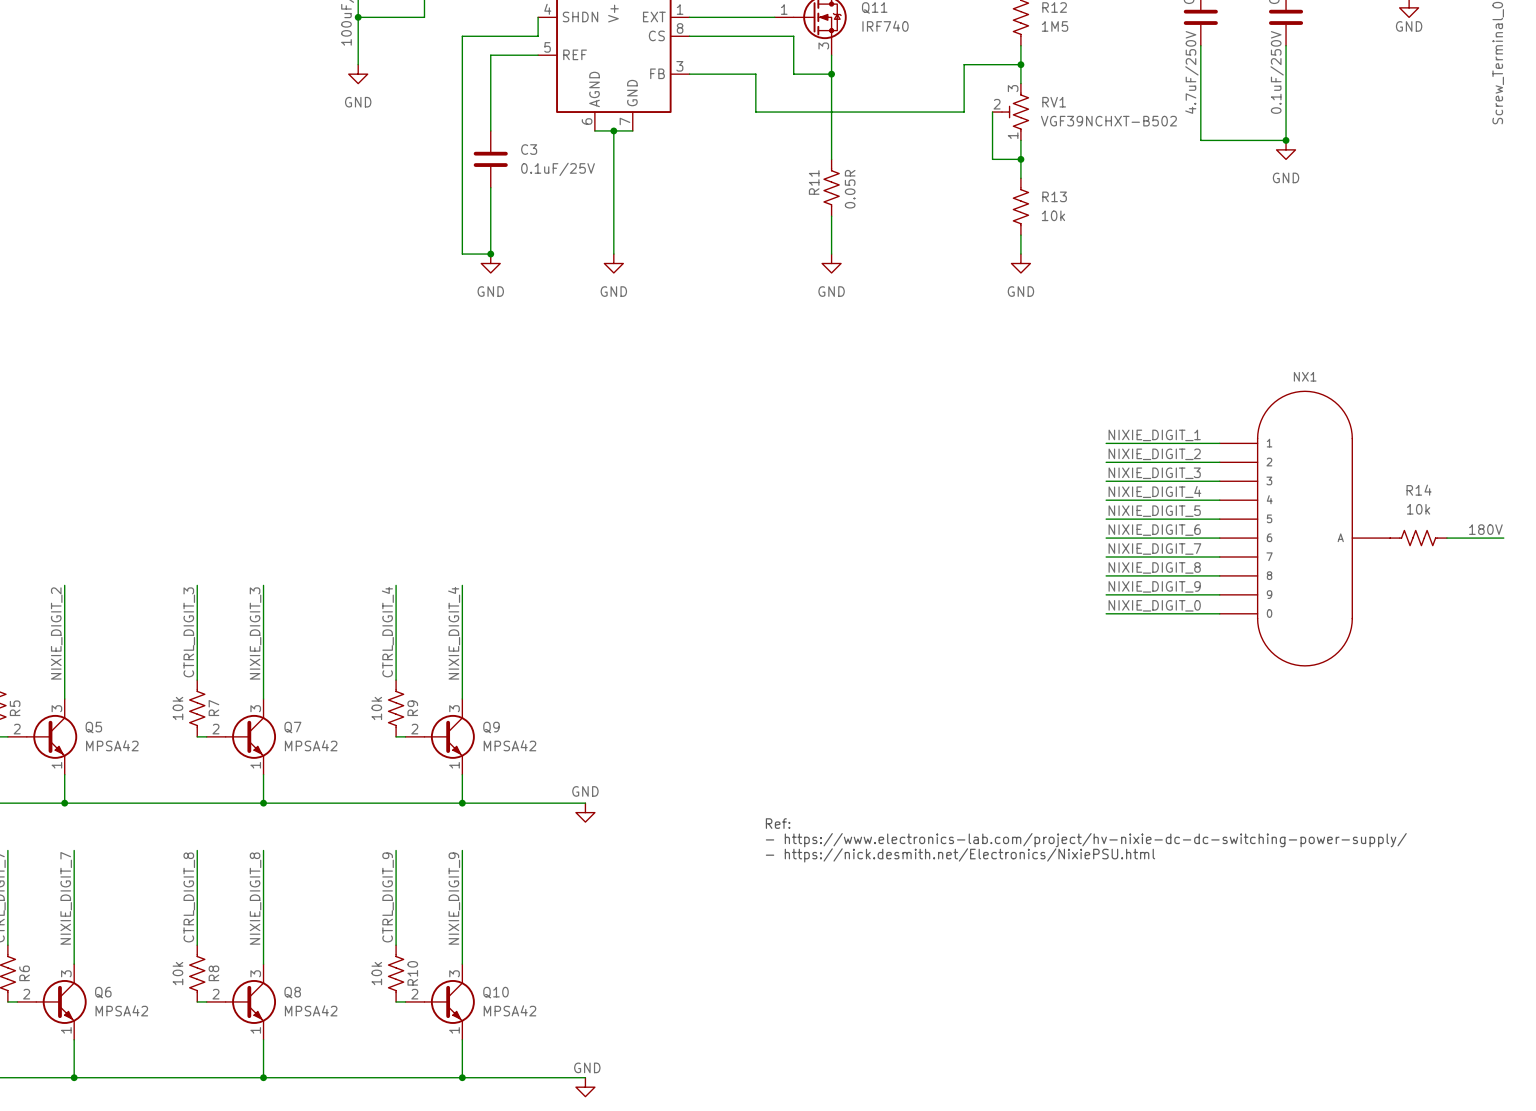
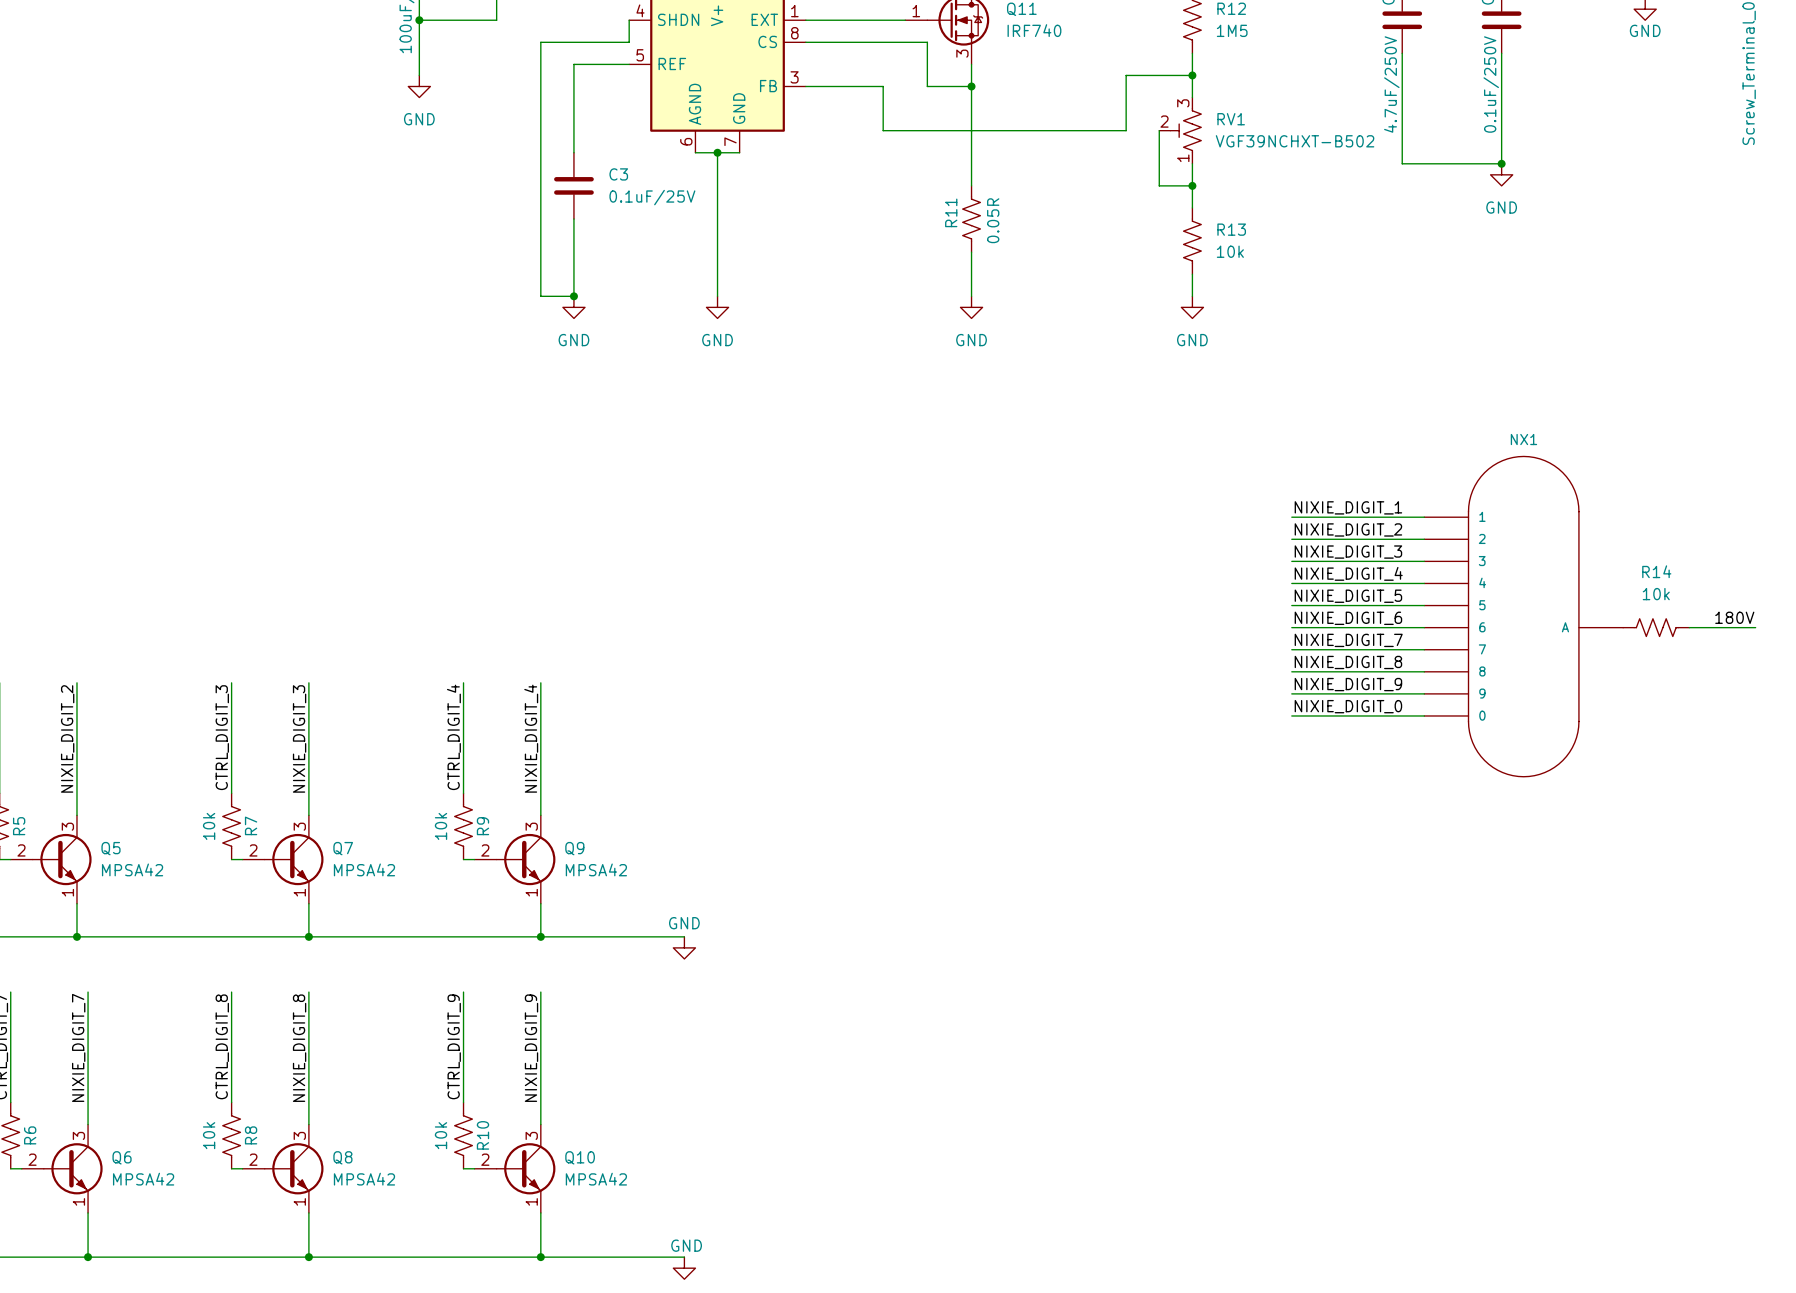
text: Ref: (778, 823) -> none
text: - https://www.electronics-lab.com/project/hv-nixie-dc-dc-switching-power-supply/ (1086, 840) -> none
text: - https://nick.desmith.net/Electronics/NixiePSU.html (960, 855) -> none

